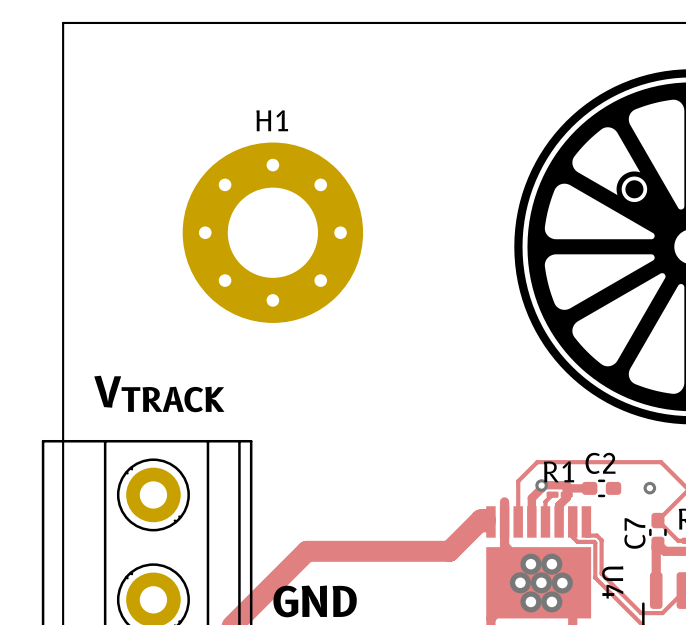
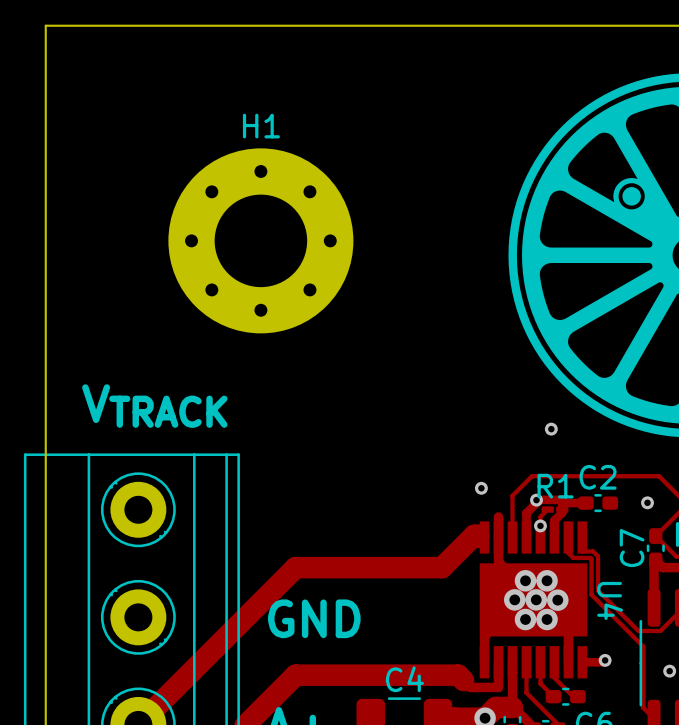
via: none -> (551, 429)
via: none -> (481, 488)
via: none -> (540, 525)

